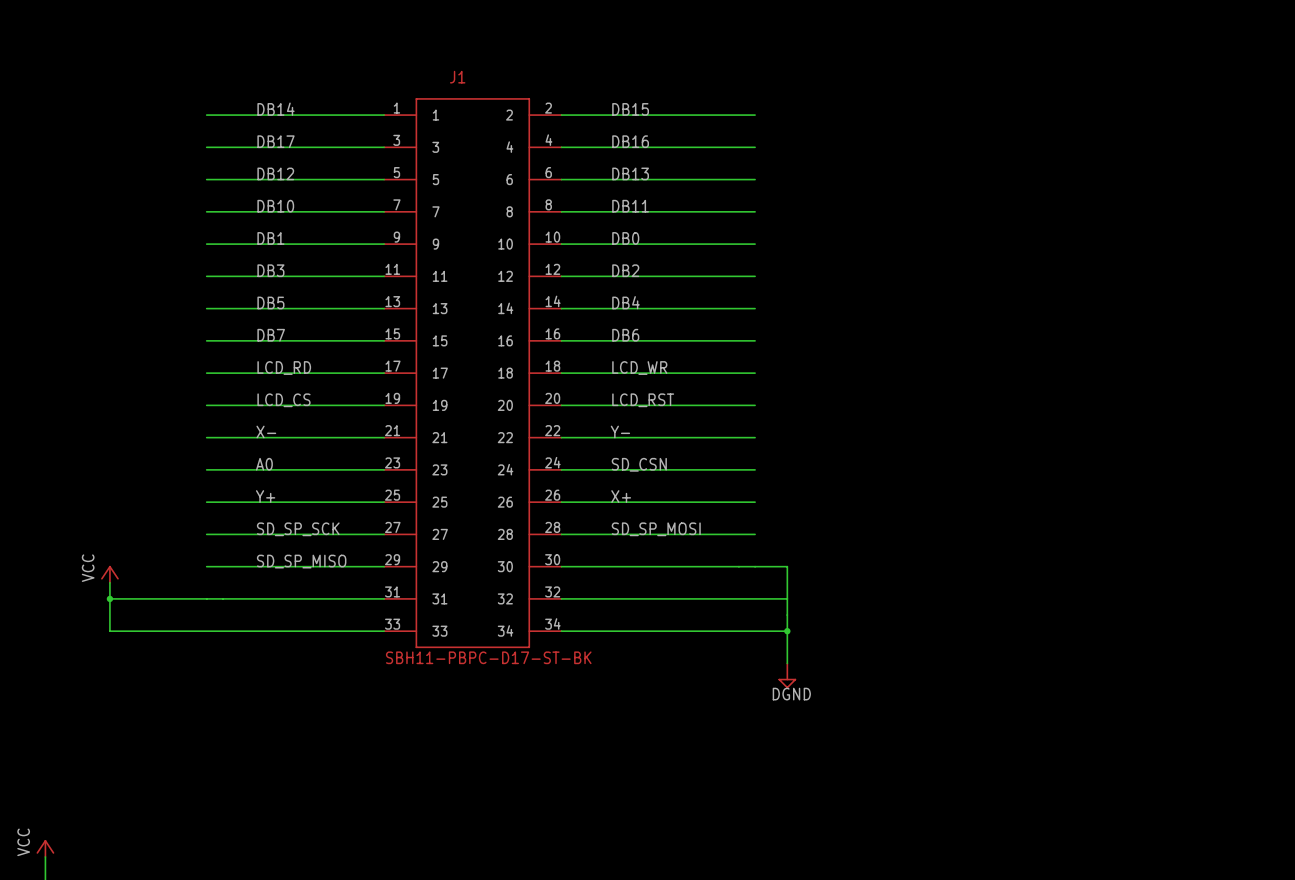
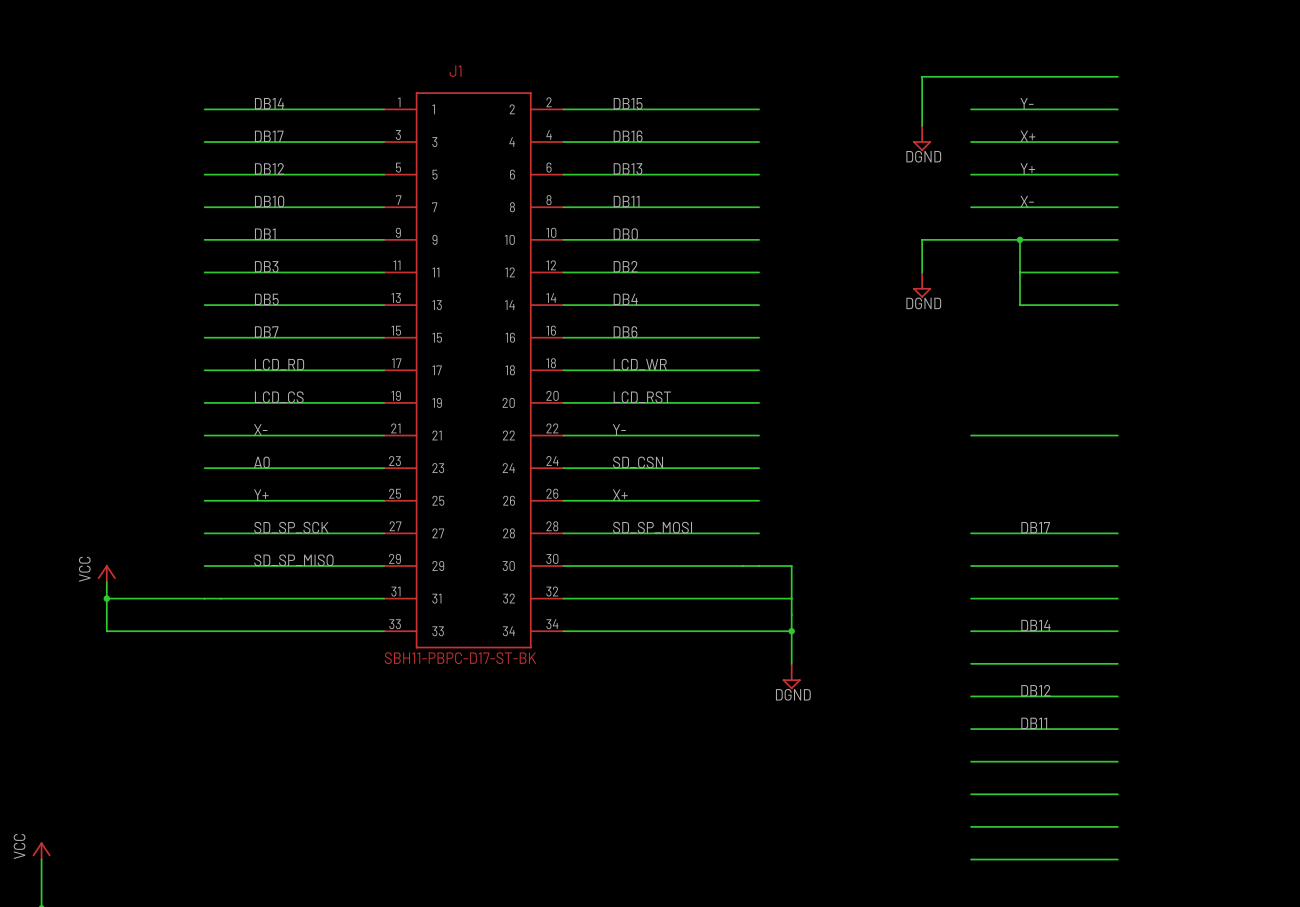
wire: none -> (1117, 76) (922, 76) (922, 125)
label: none -> Y- (1027, 103)
wire: none -> (971, 109) (1117, 109)
label: none -> X+ (1027, 136)
power symbol: none -> DGND (922, 138)
wire: none -> (971, 142) (1117, 142)
label: none -> Y+ (1027, 168)
wire: none -> (971, 174) (1117, 174)
label: none -> X- (1027, 201)
wire: none -> (971, 207) (1117, 207)
wire: none -> (1019, 239) (1019, 305) (1117, 305)
junction: none -> (1019, 239)
wire: none -> (1117, 239) (922, 239) (922, 272)
wire: none -> (1019, 272) (1117, 272)
power symbol: none -> DGND (922, 285)
wire: none -> (971, 435) (1117, 435)
label: none -> DB17 (1035, 527)
wire: none -> (971, 533) (1117, 533)
wire: none -> (971, 566) (1117, 566)
wire: none -> (971, 598) (1117, 598)
label: none -> DB14 (1035, 625)
wire: none -> (971, 631) (1117, 631)
wire: none -> (971, 663) (1117, 663)
label: none -> DB12 (1035, 690)
wire: none -> (971, 696) (1117, 696)
label: none -> DB11 (1034, 723)
wire: none -> (971, 729) (1117, 729)
wire: none -> (971, 761) (1117, 761)
wire: none -> (971, 794) (1117, 794)
wire: none -> (971, 826) (1117, 826)
wire: none -> (971, 859) (1117, 859)

